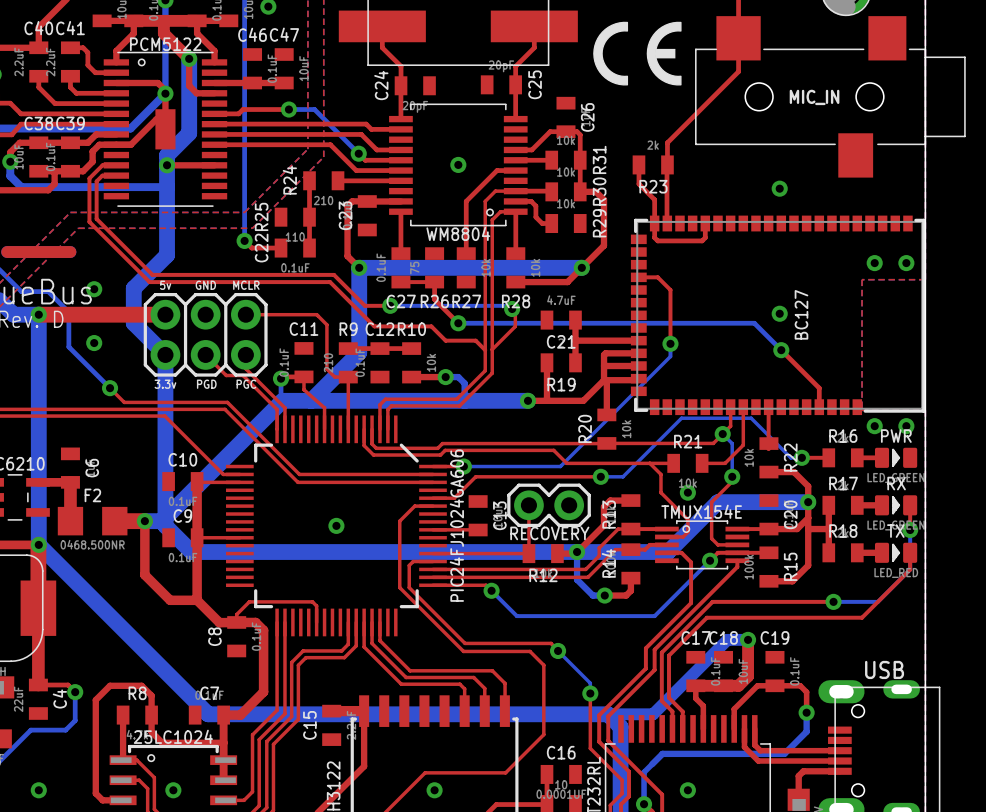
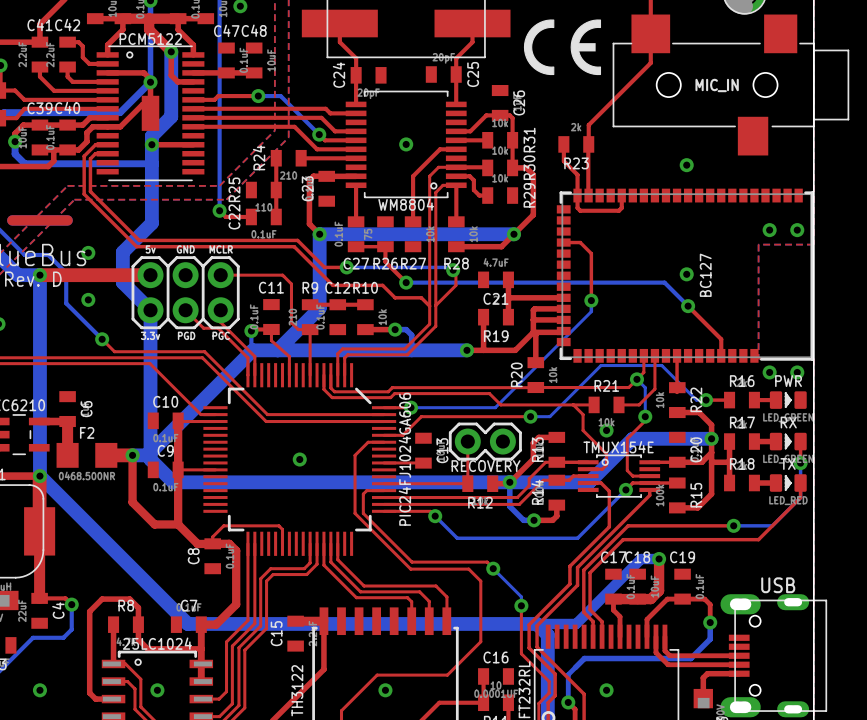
C40 name: C40 (38, 28) -> C41 (39, 24)
C41 name: C41 (70, 28) -> C42 (67, 24)
C46 name: C46 (252, 34) -> C47 (226, 30)
C47 name: C47 (284, 34) -> C48 (254, 30)
C38 name: C38 (38, 123) -> C39 (39, 108)
C39 name: C39 (70, 123) -> C40 (67, 107)

